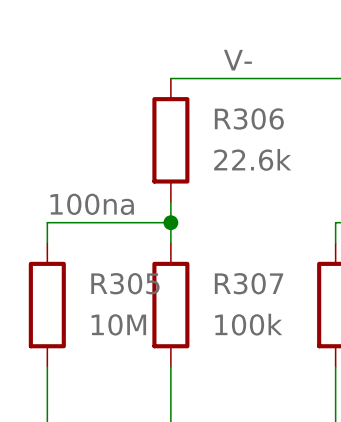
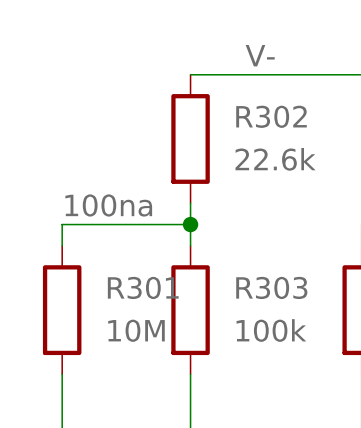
R306 name: R306 (249, 118) -> R302 (271, 116)
R305 name: R305 (125, 283) -> R301 (143, 287)
R307 name: R307 (249, 283) -> R303 (271, 287)

